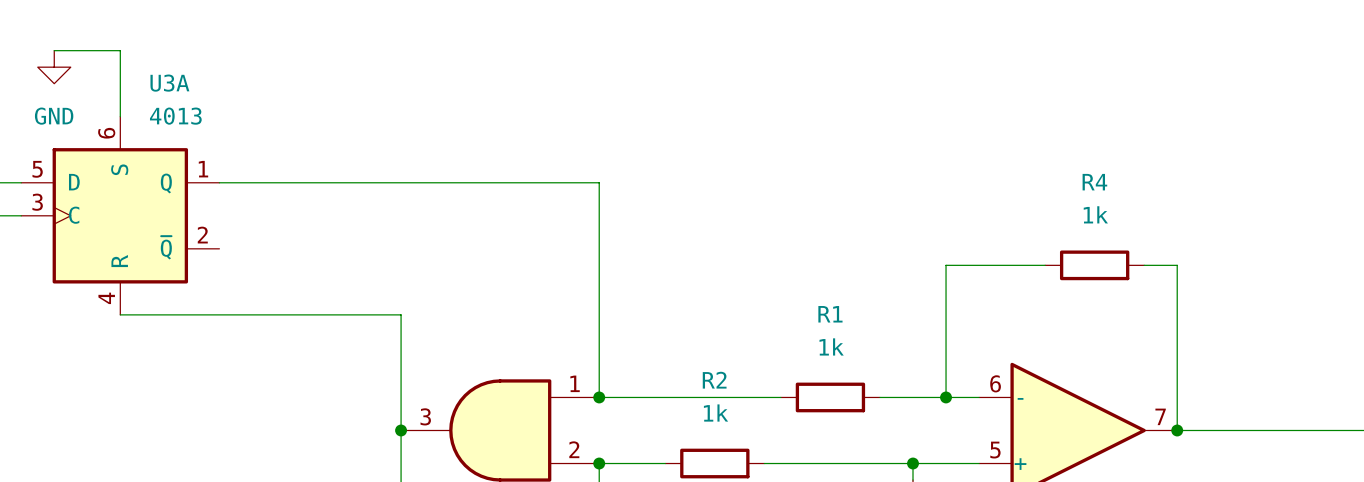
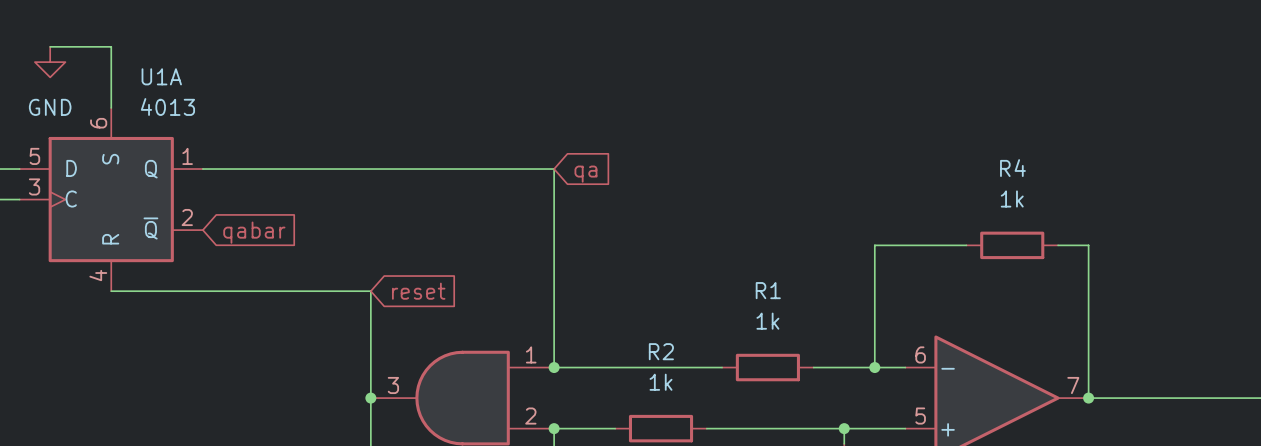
U3A name: U3A (169, 83) -> U1A (161, 76)
global label: none -> qa (585, 174)
global label: none -> qabar (254, 232)
global label: none -> reset (418, 291)

